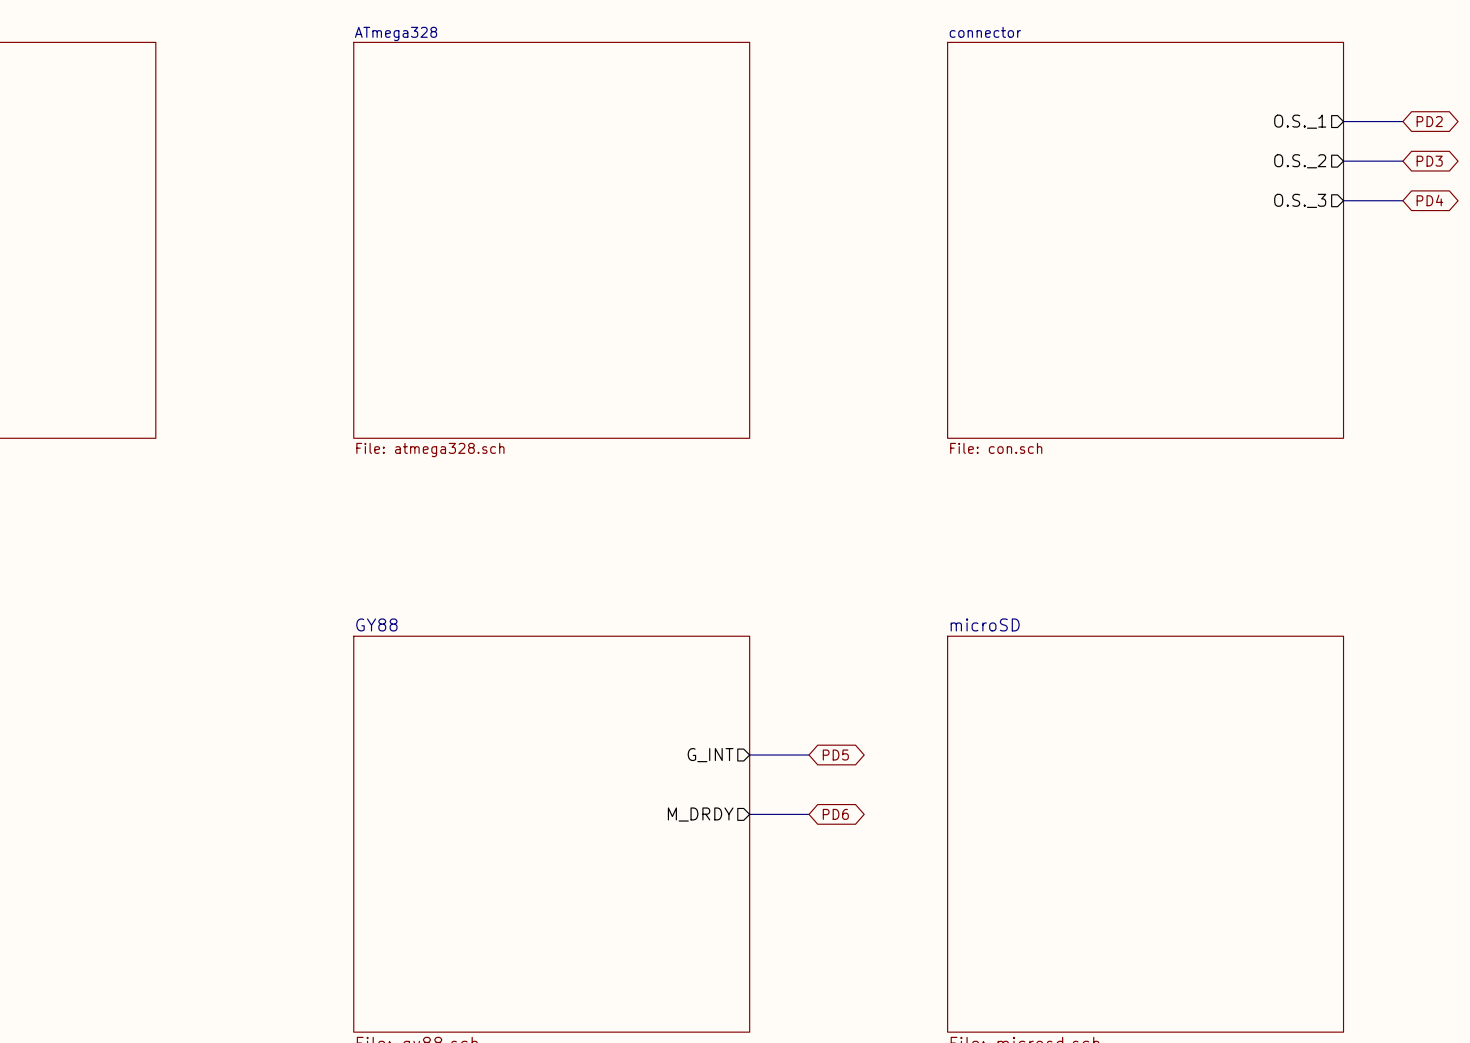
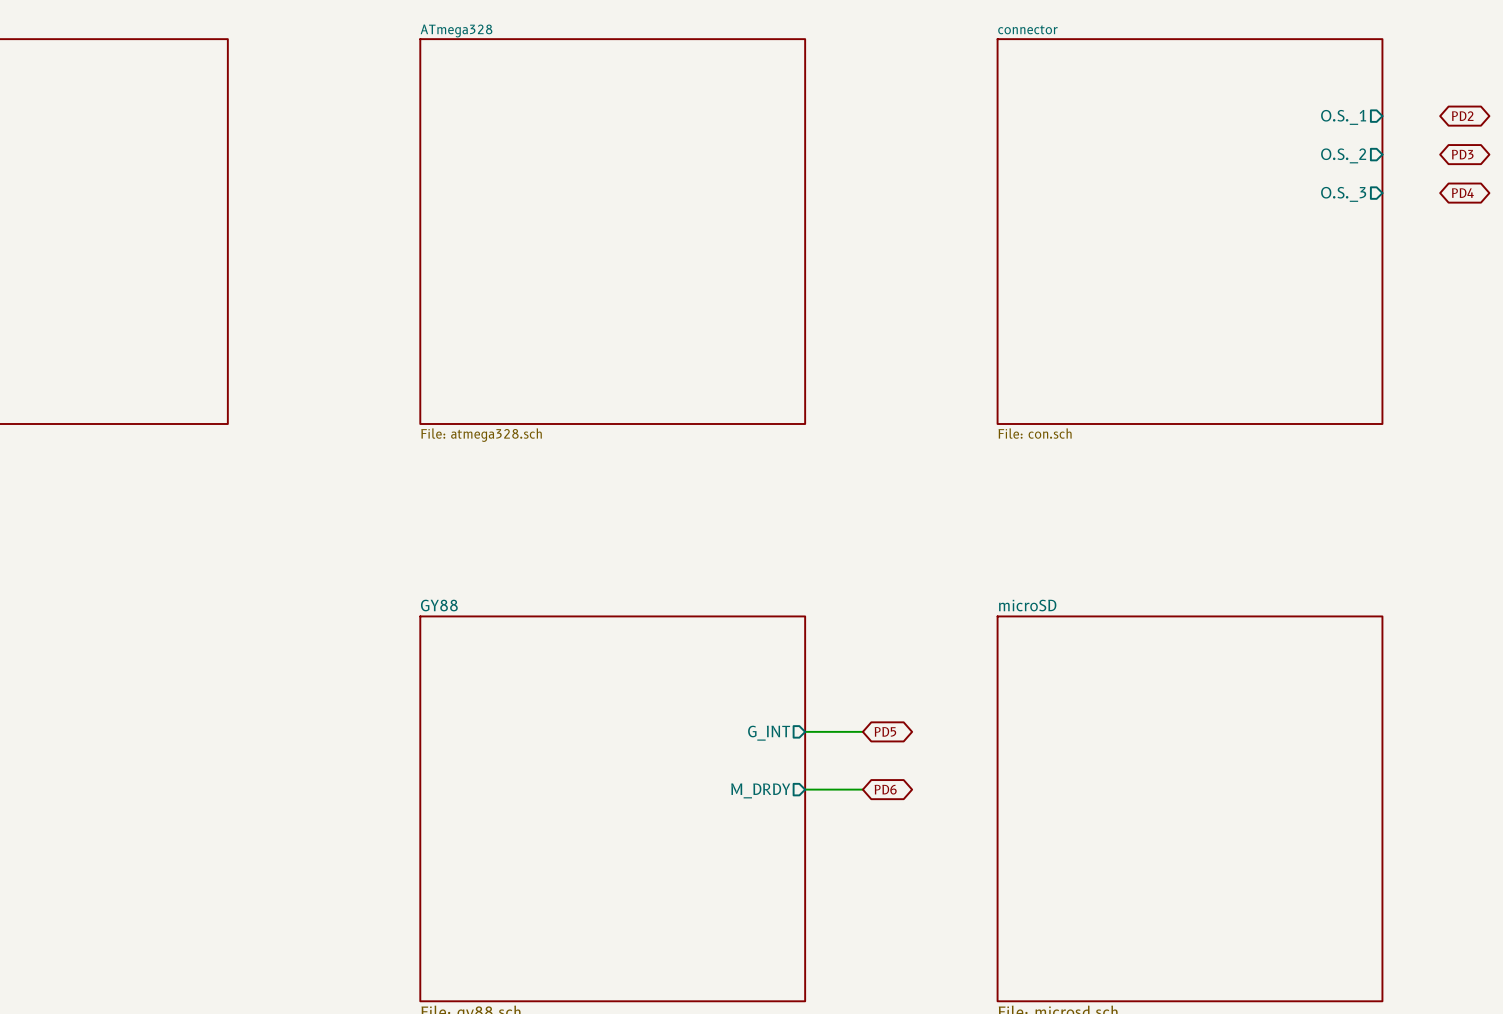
wire: (1343, 121) (1402, 121) -> none
wire: (1343, 161) (1402, 161) -> none
wire: (1343, 200) (1402, 200) -> none

